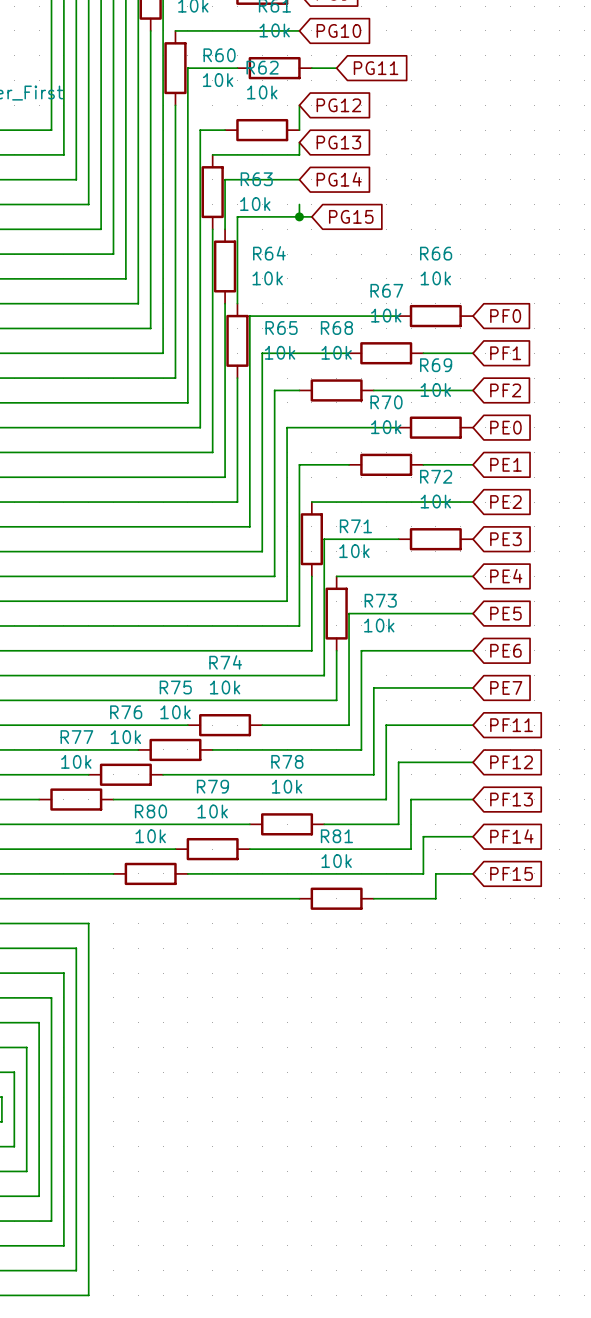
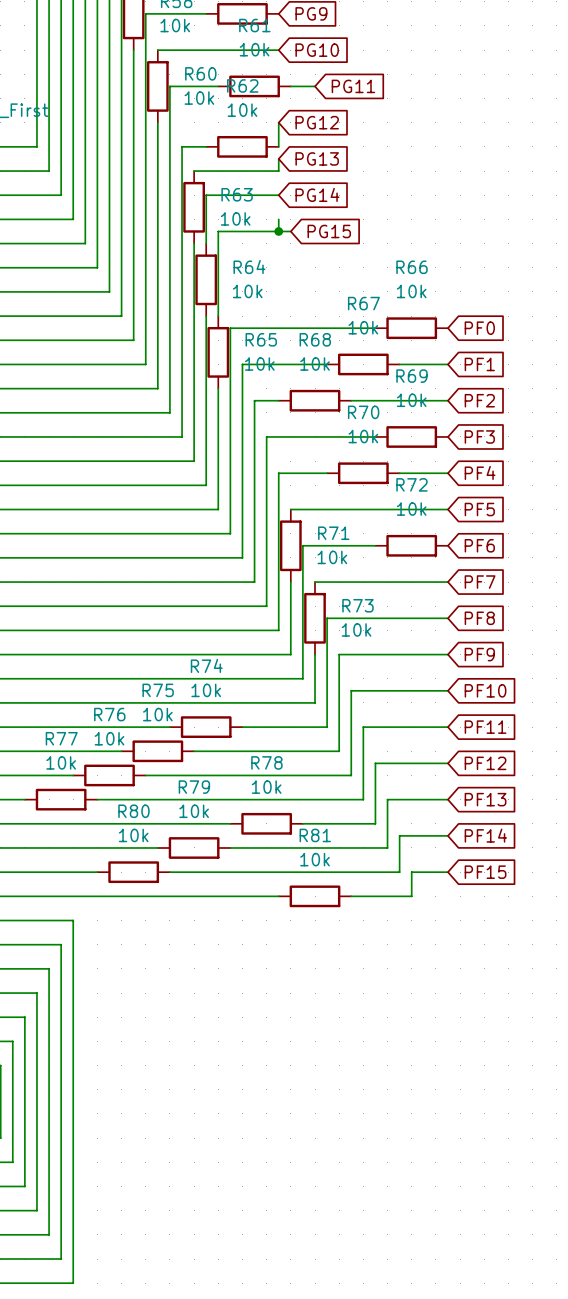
global label: PE0 (505, 427) -> PF3 (479, 436)
global label: PE1 (505, 464) -> PF4 (480, 472)
global label: PE2 (505, 502) -> PF5 (479, 509)
global label: PE3 (505, 539) -> PF6 (479, 545)
global label: PE4 (506, 576) -> PF7 (480, 582)
global label: PE5 (505, 613) -> PF8 (479, 618)
global label: PE6 (505, 650) -> PF9 (479, 654)
global label: PE7 (506, 687) -> PF10 (485, 690)

